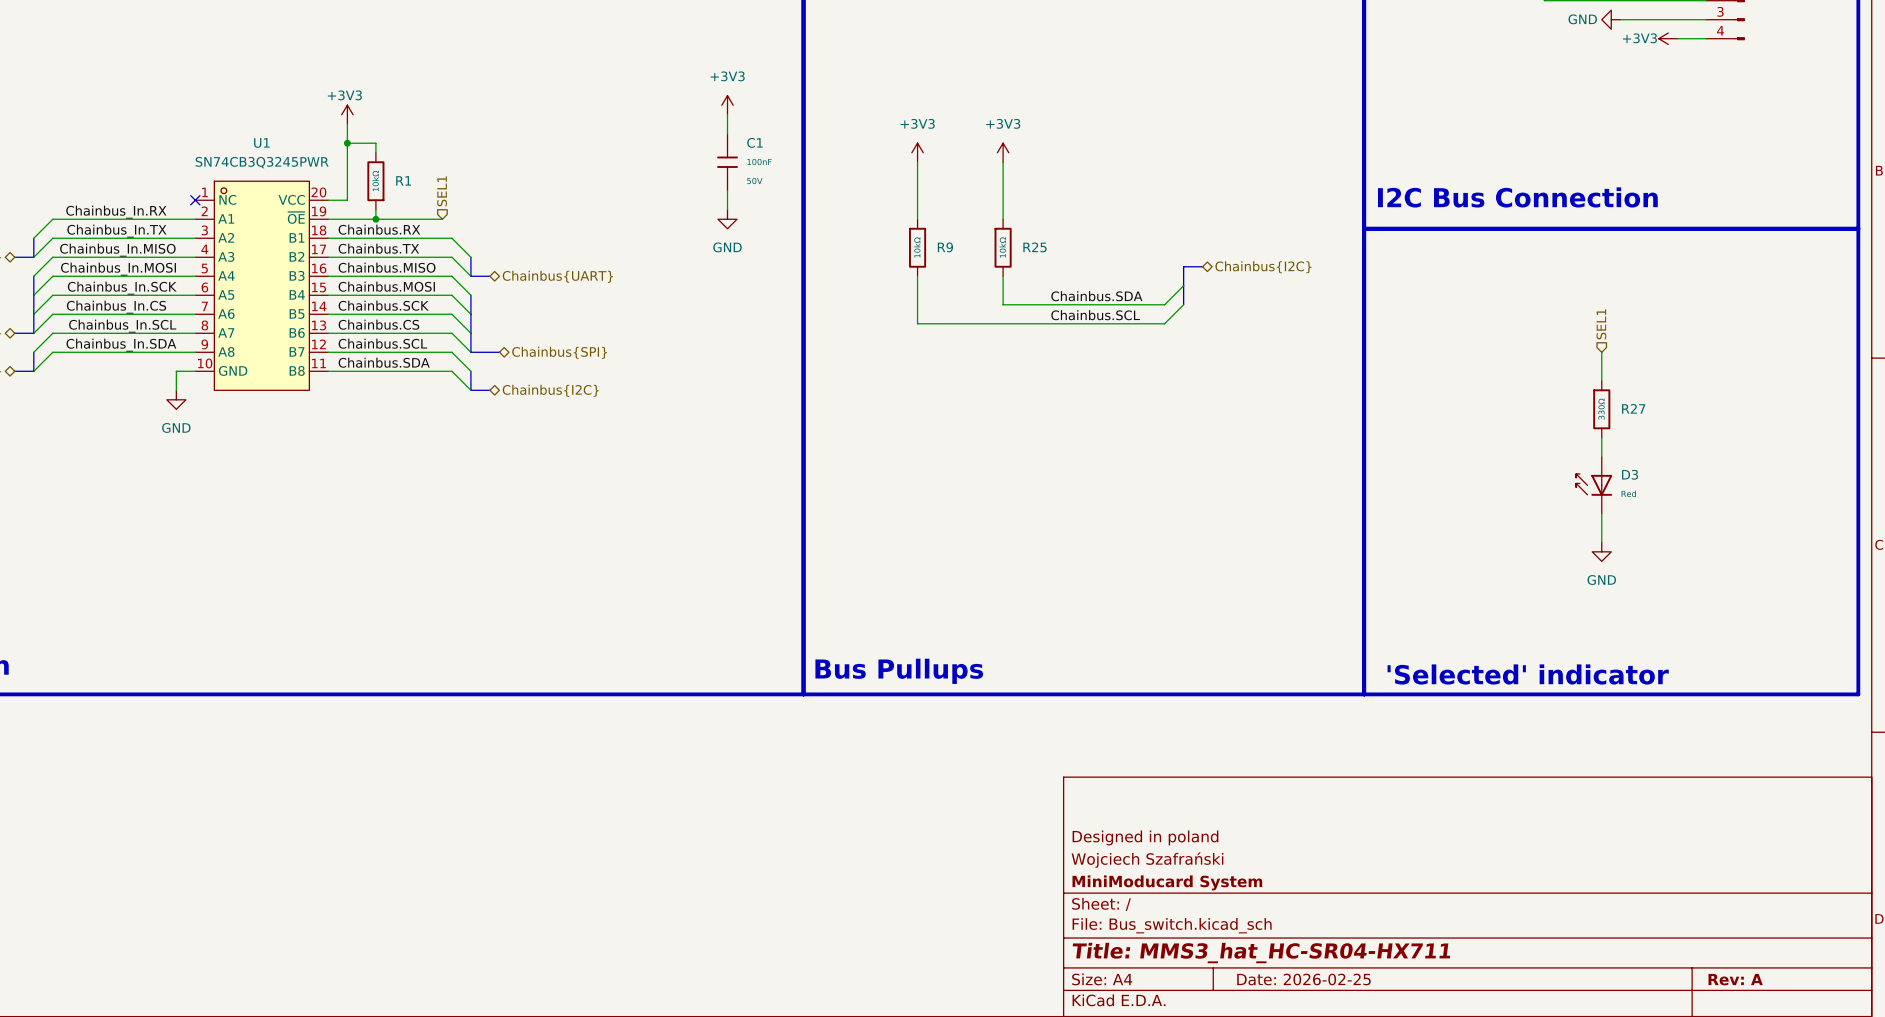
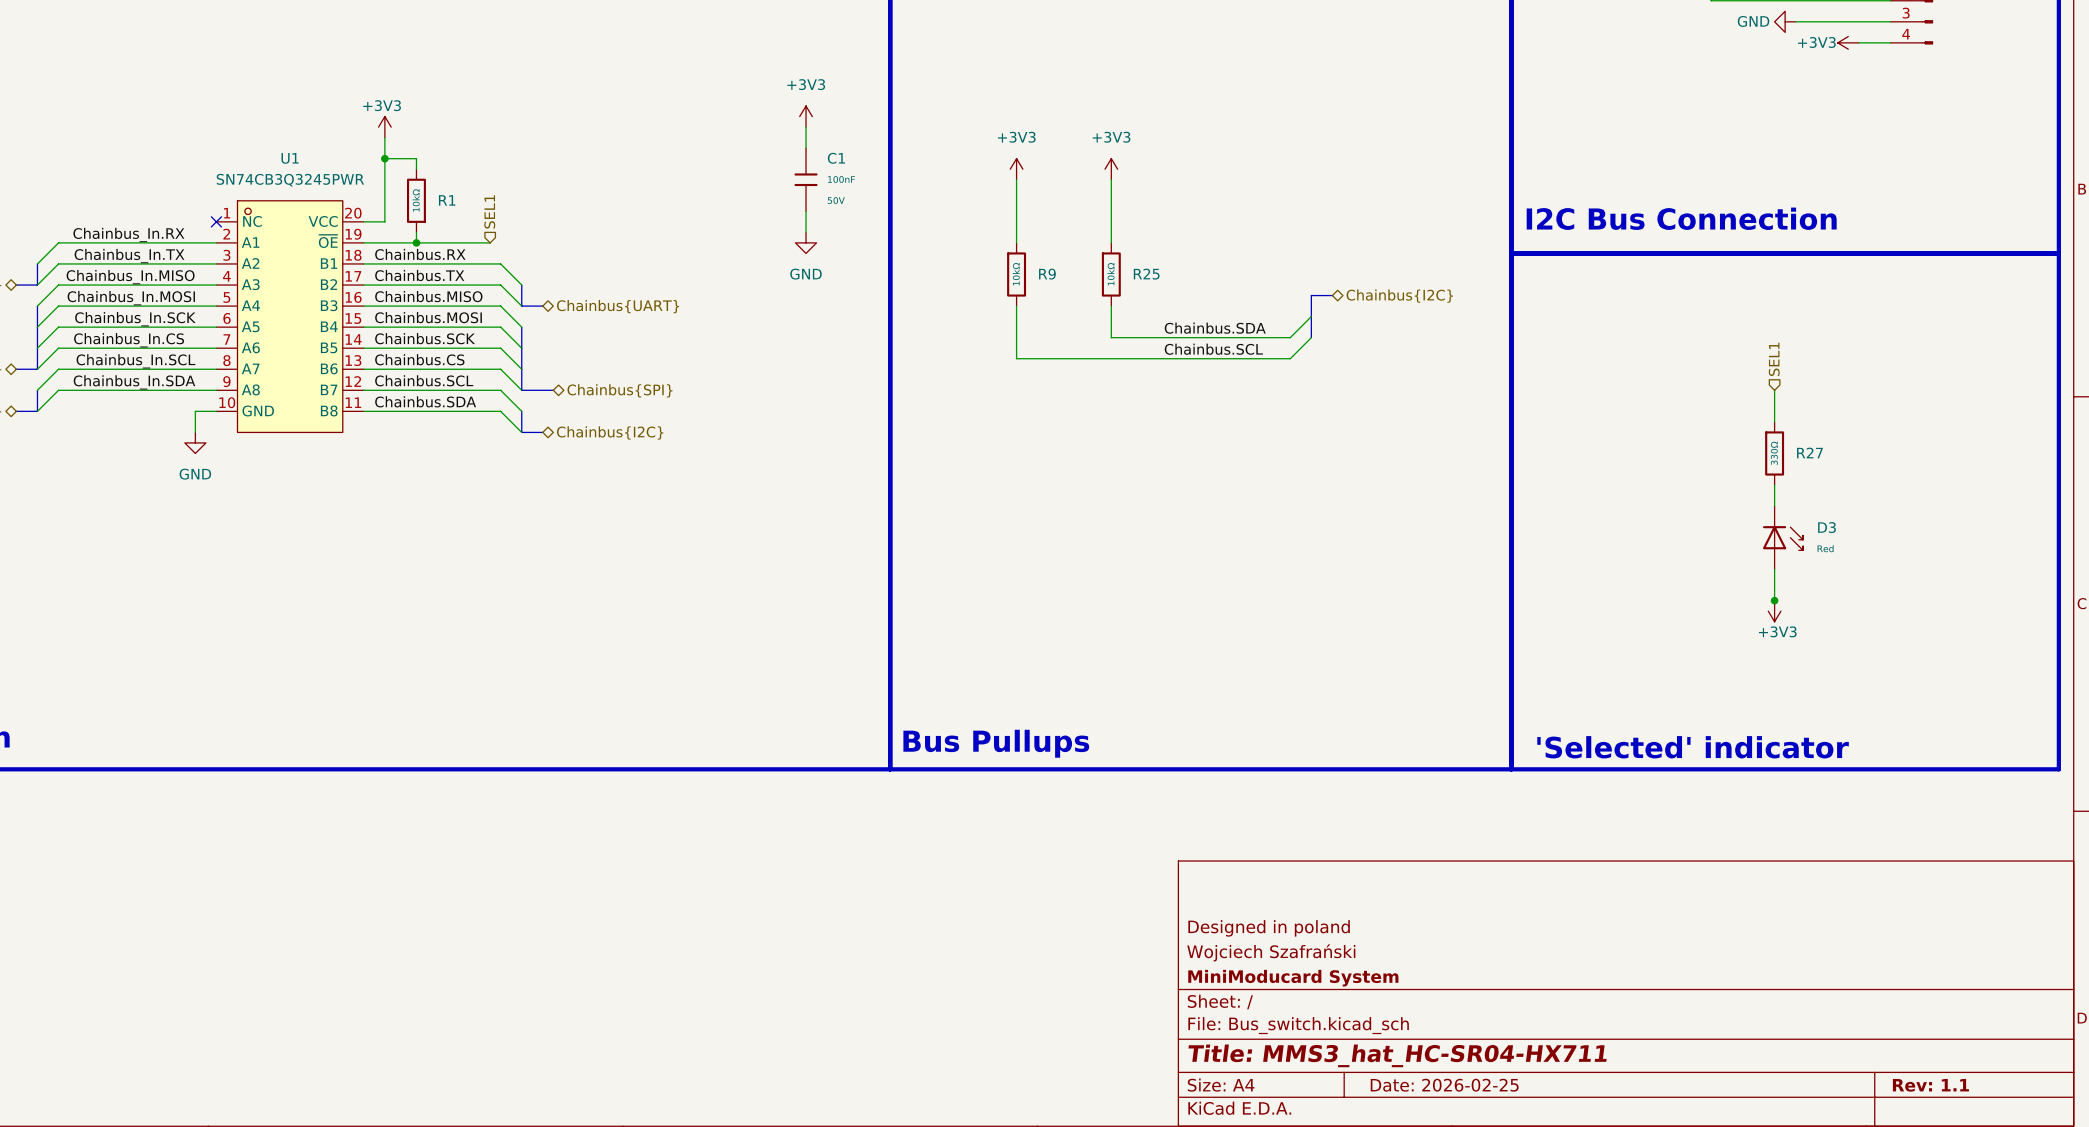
D3 rotation: 0° (1593, 484) -> 180° (1783, 538)
junction: none -> (1774, 600)
power symbol: GND (1601, 551) -> +3V3 (1774, 611)
title block: Rev: A (1735, 979) -> Rev: 1.1 (1930, 1085)

